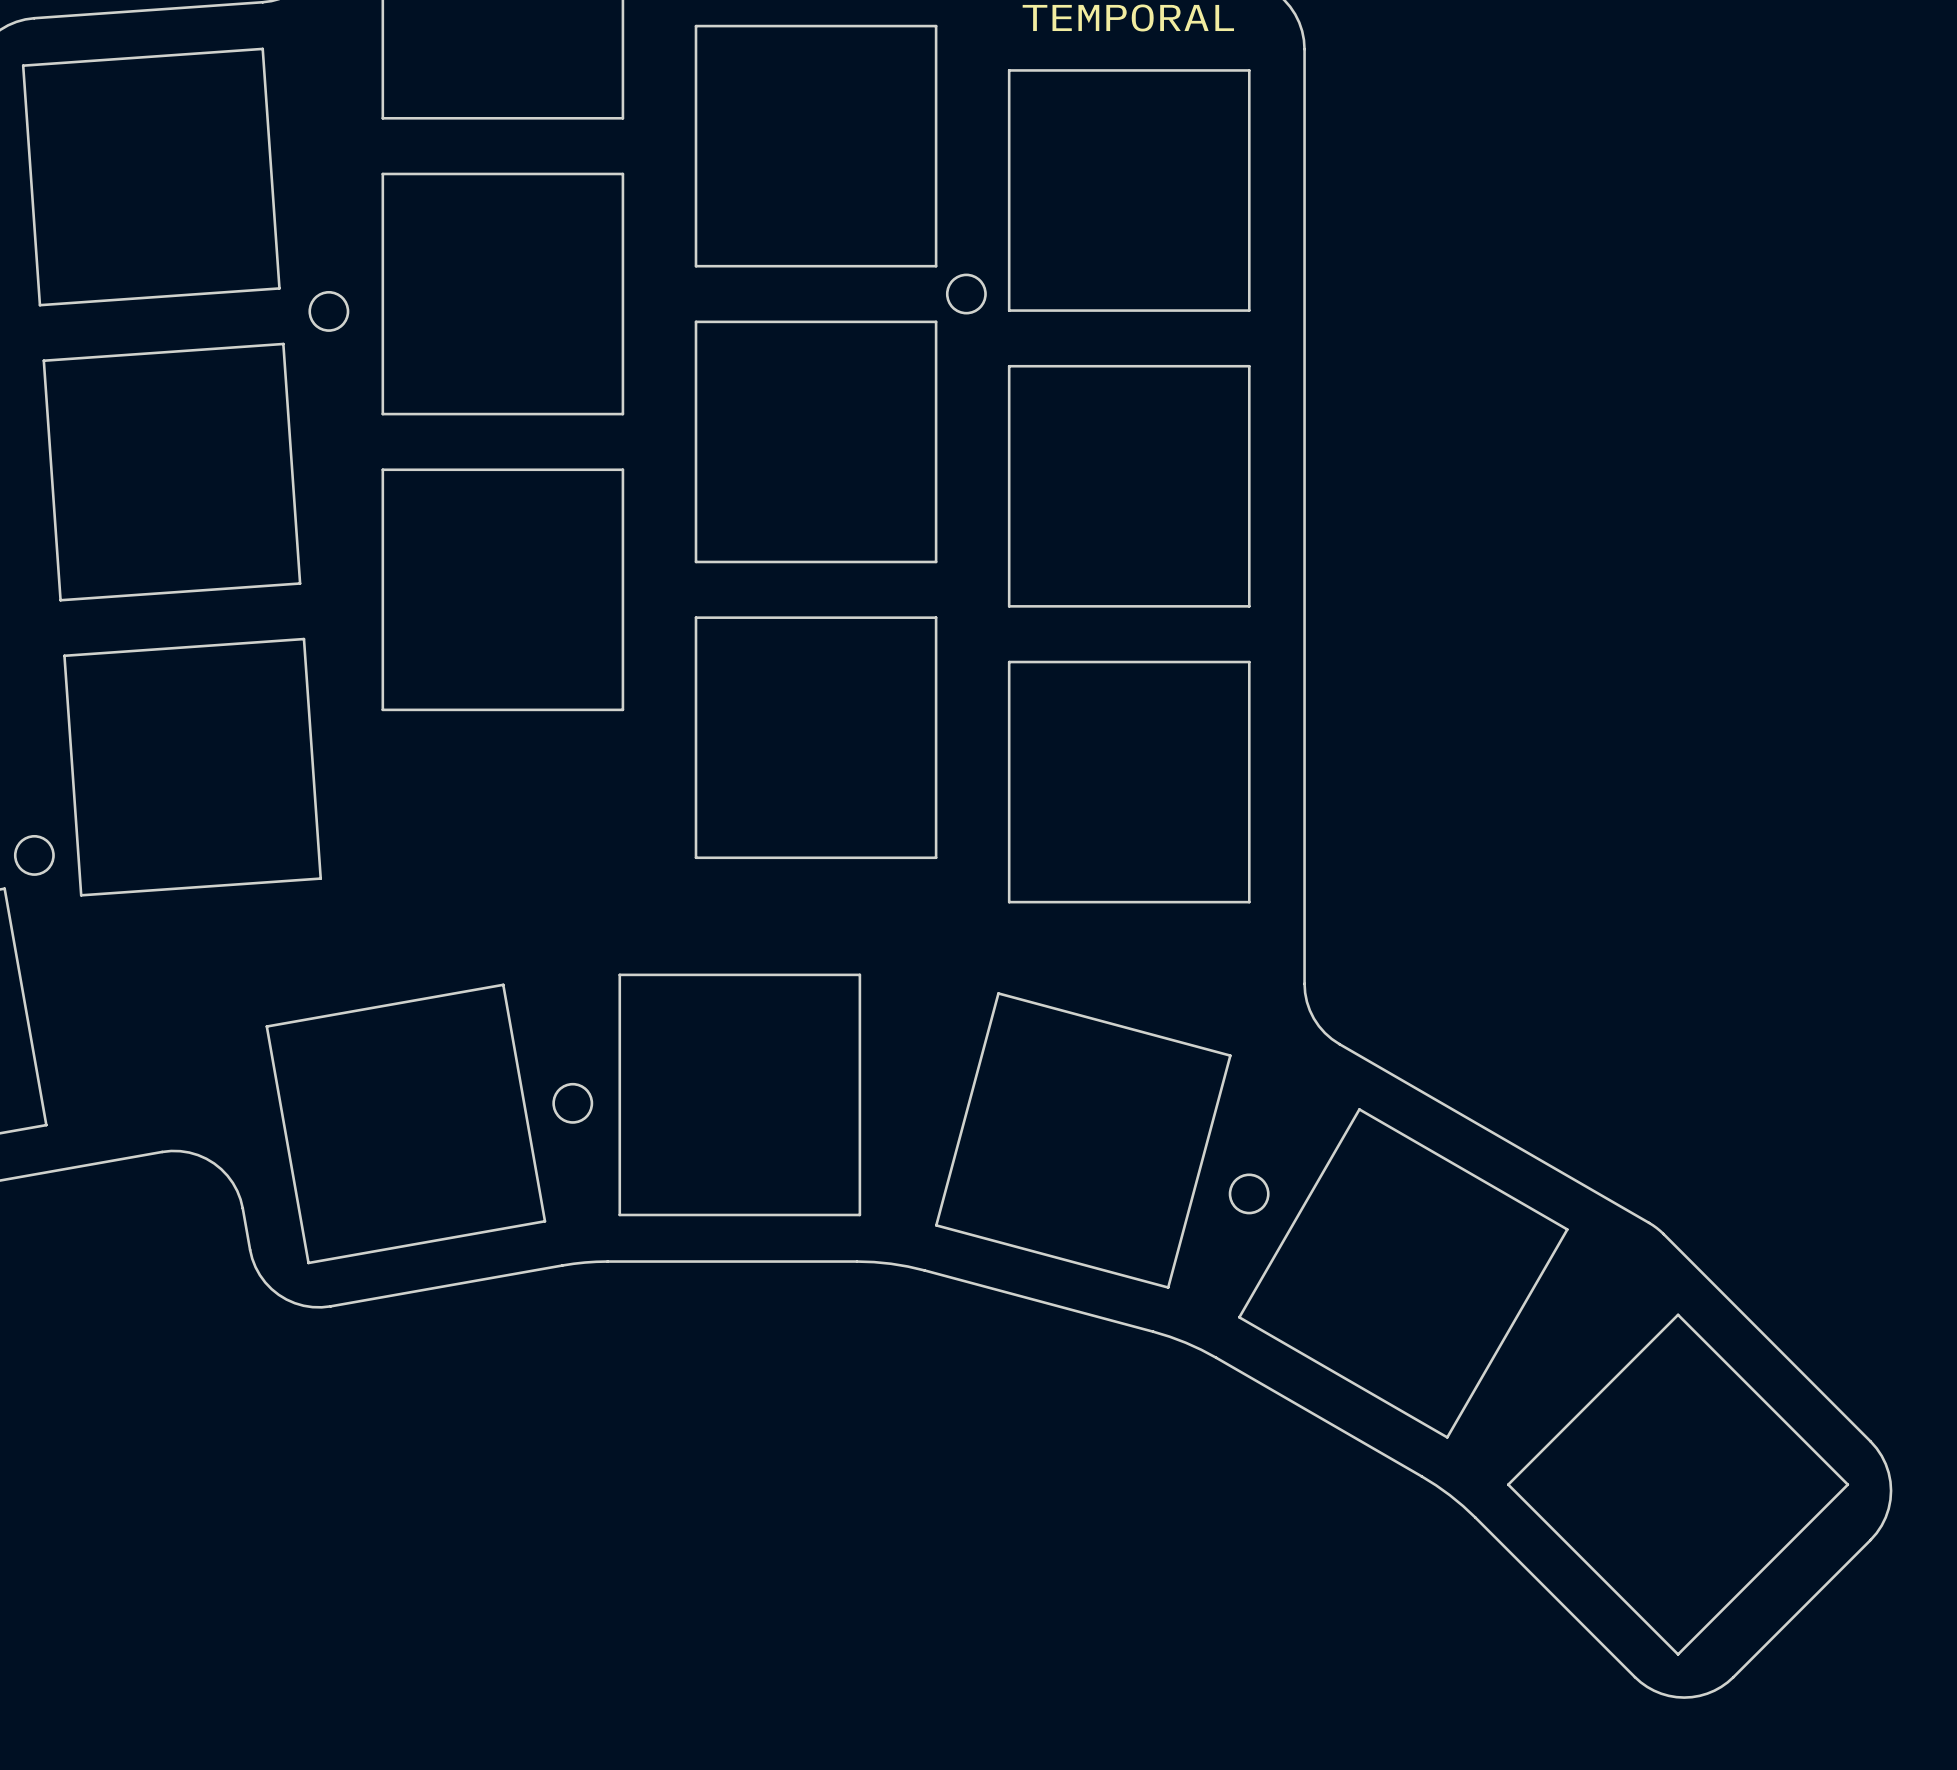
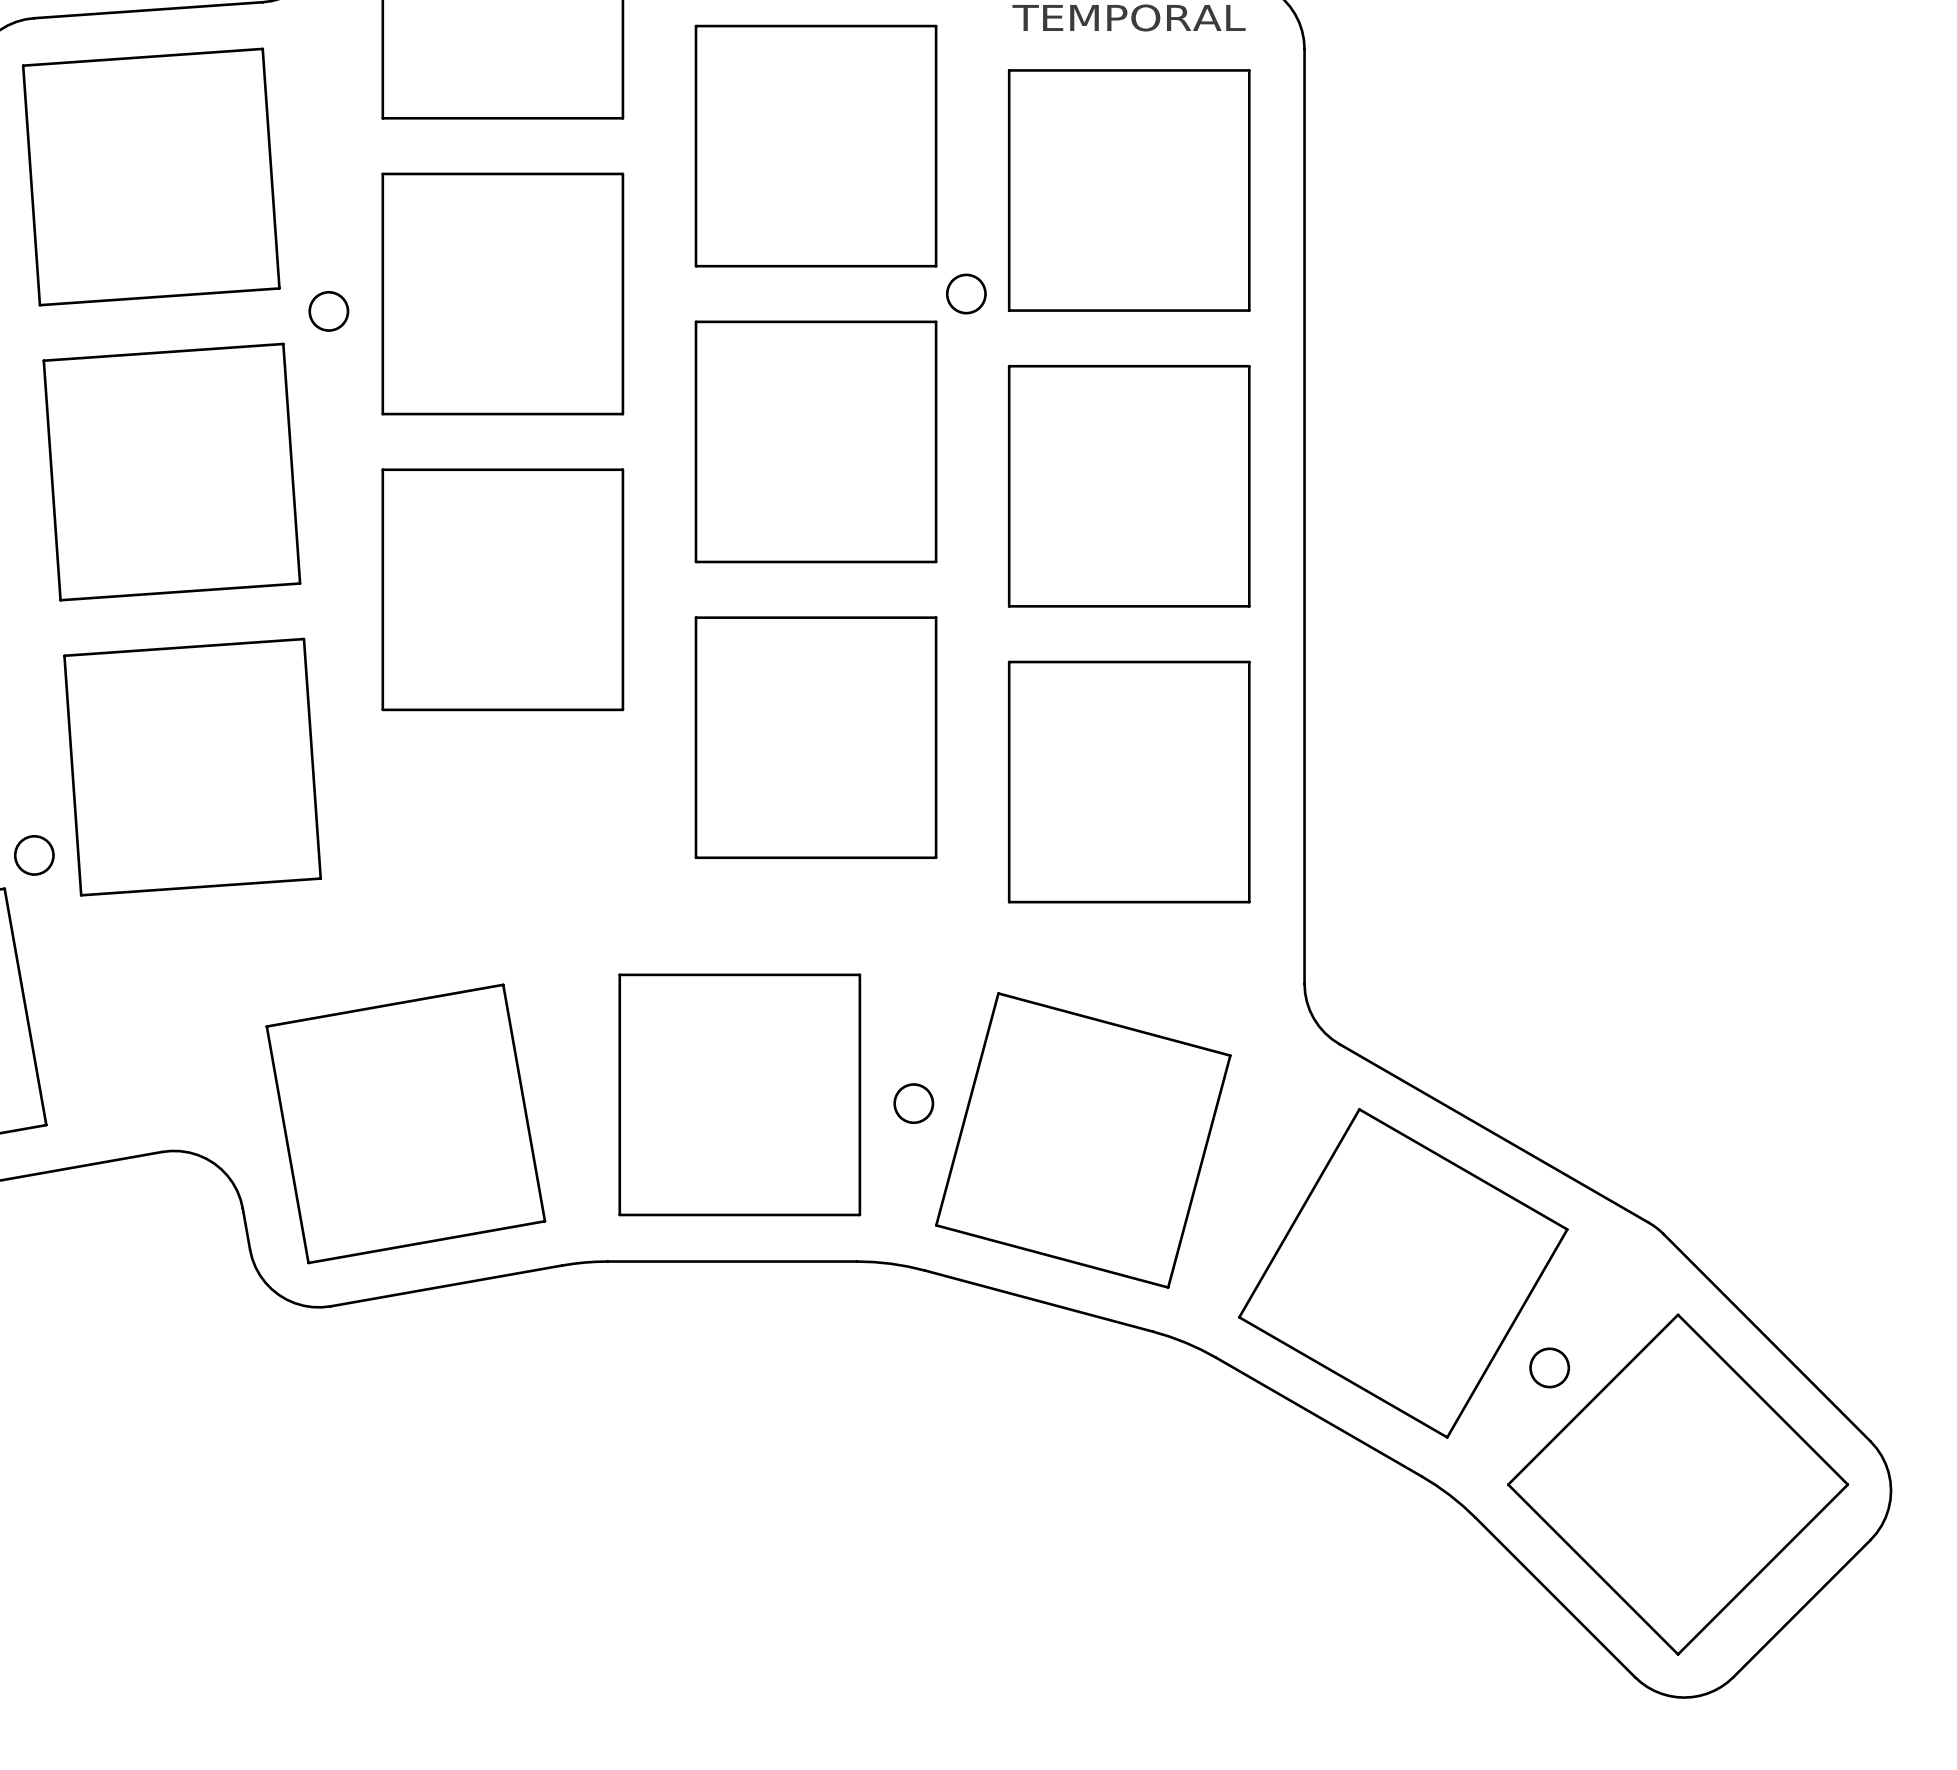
round board edge: [552, 1082, 594, 1124] -> none
round board edge: none -> [893, 1083, 935, 1125]
round board edge: [1228, 1173, 1270, 1215] -> none
round board edge: none -> [1529, 1347, 1571, 1389]

